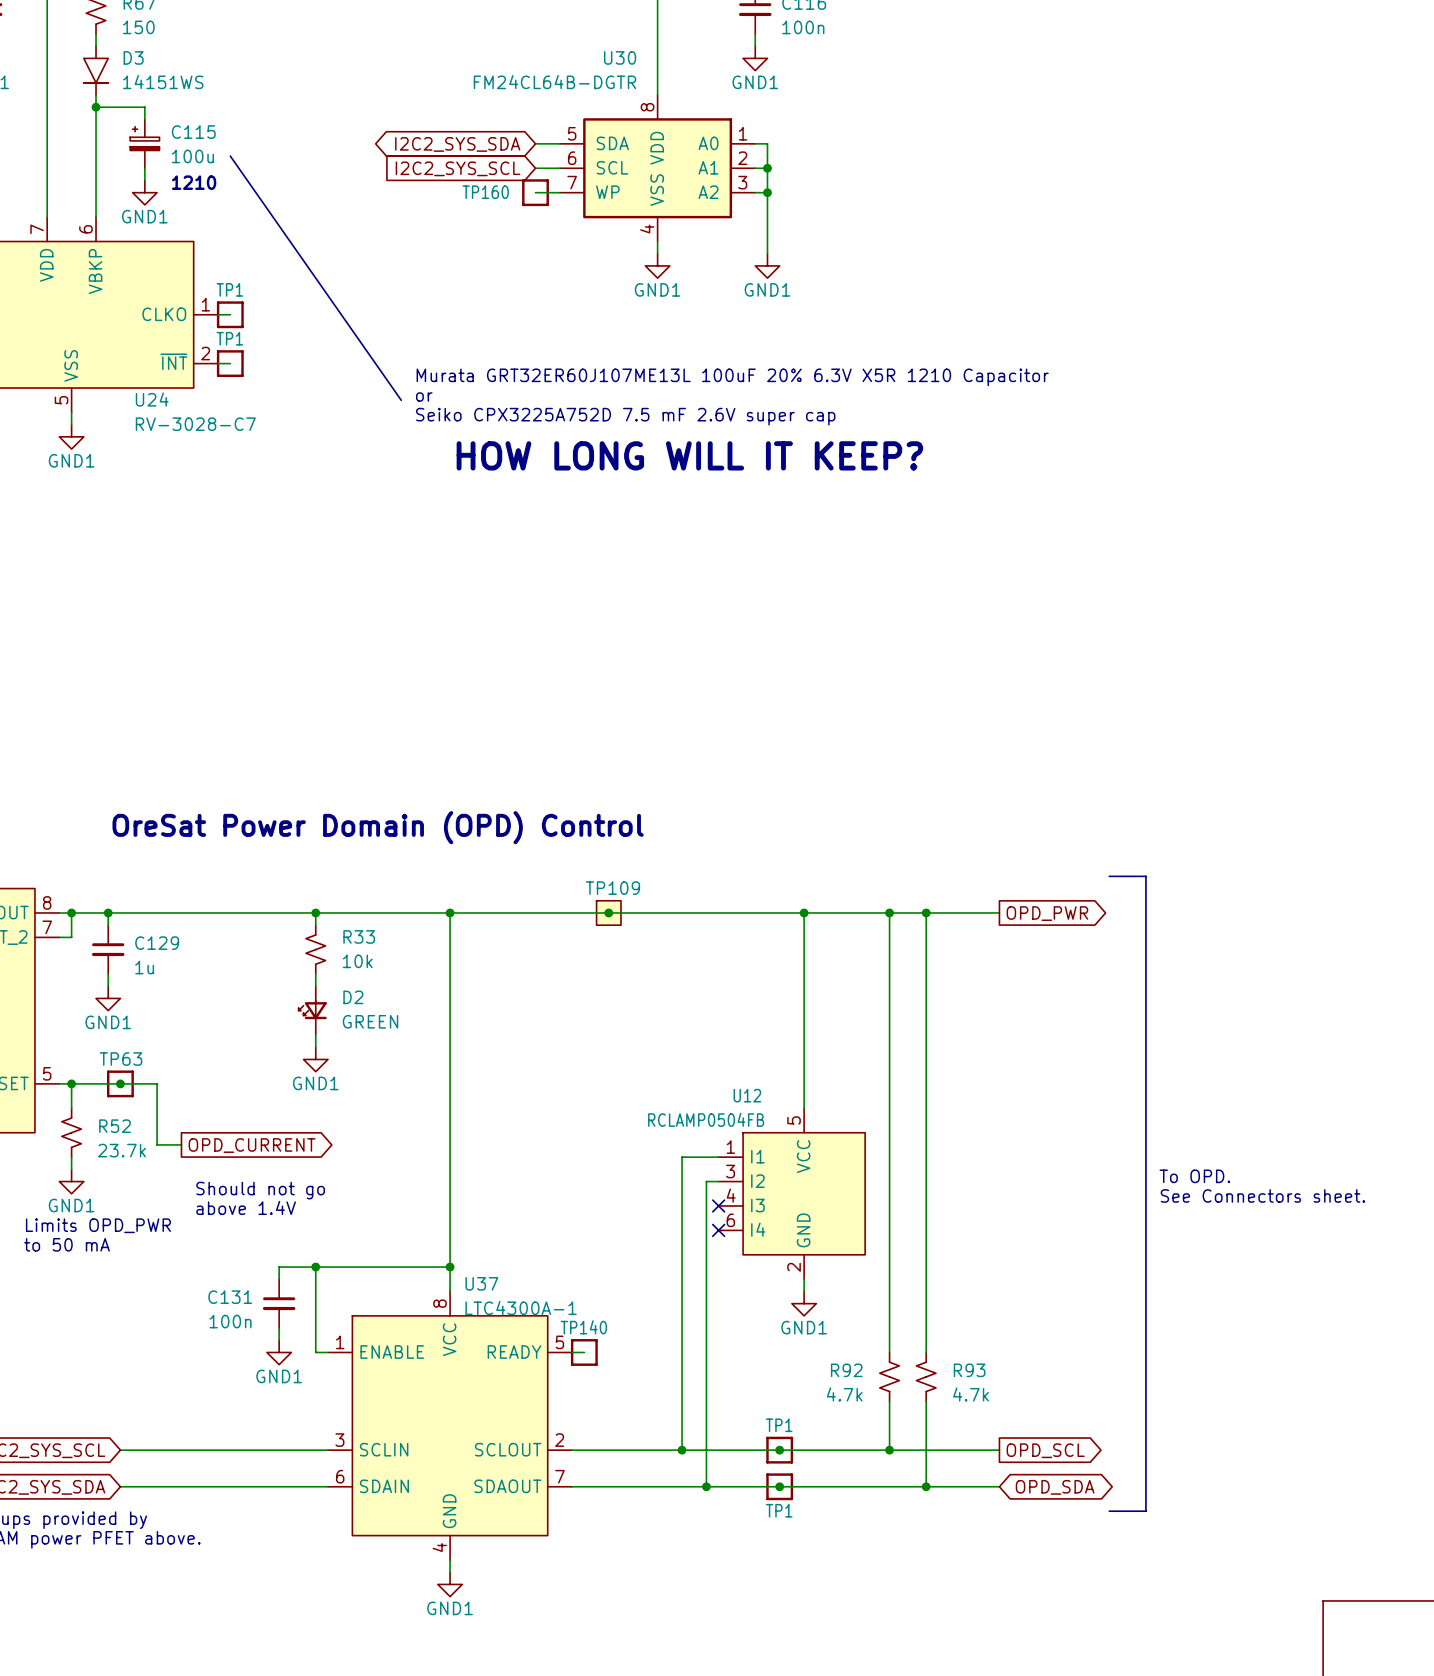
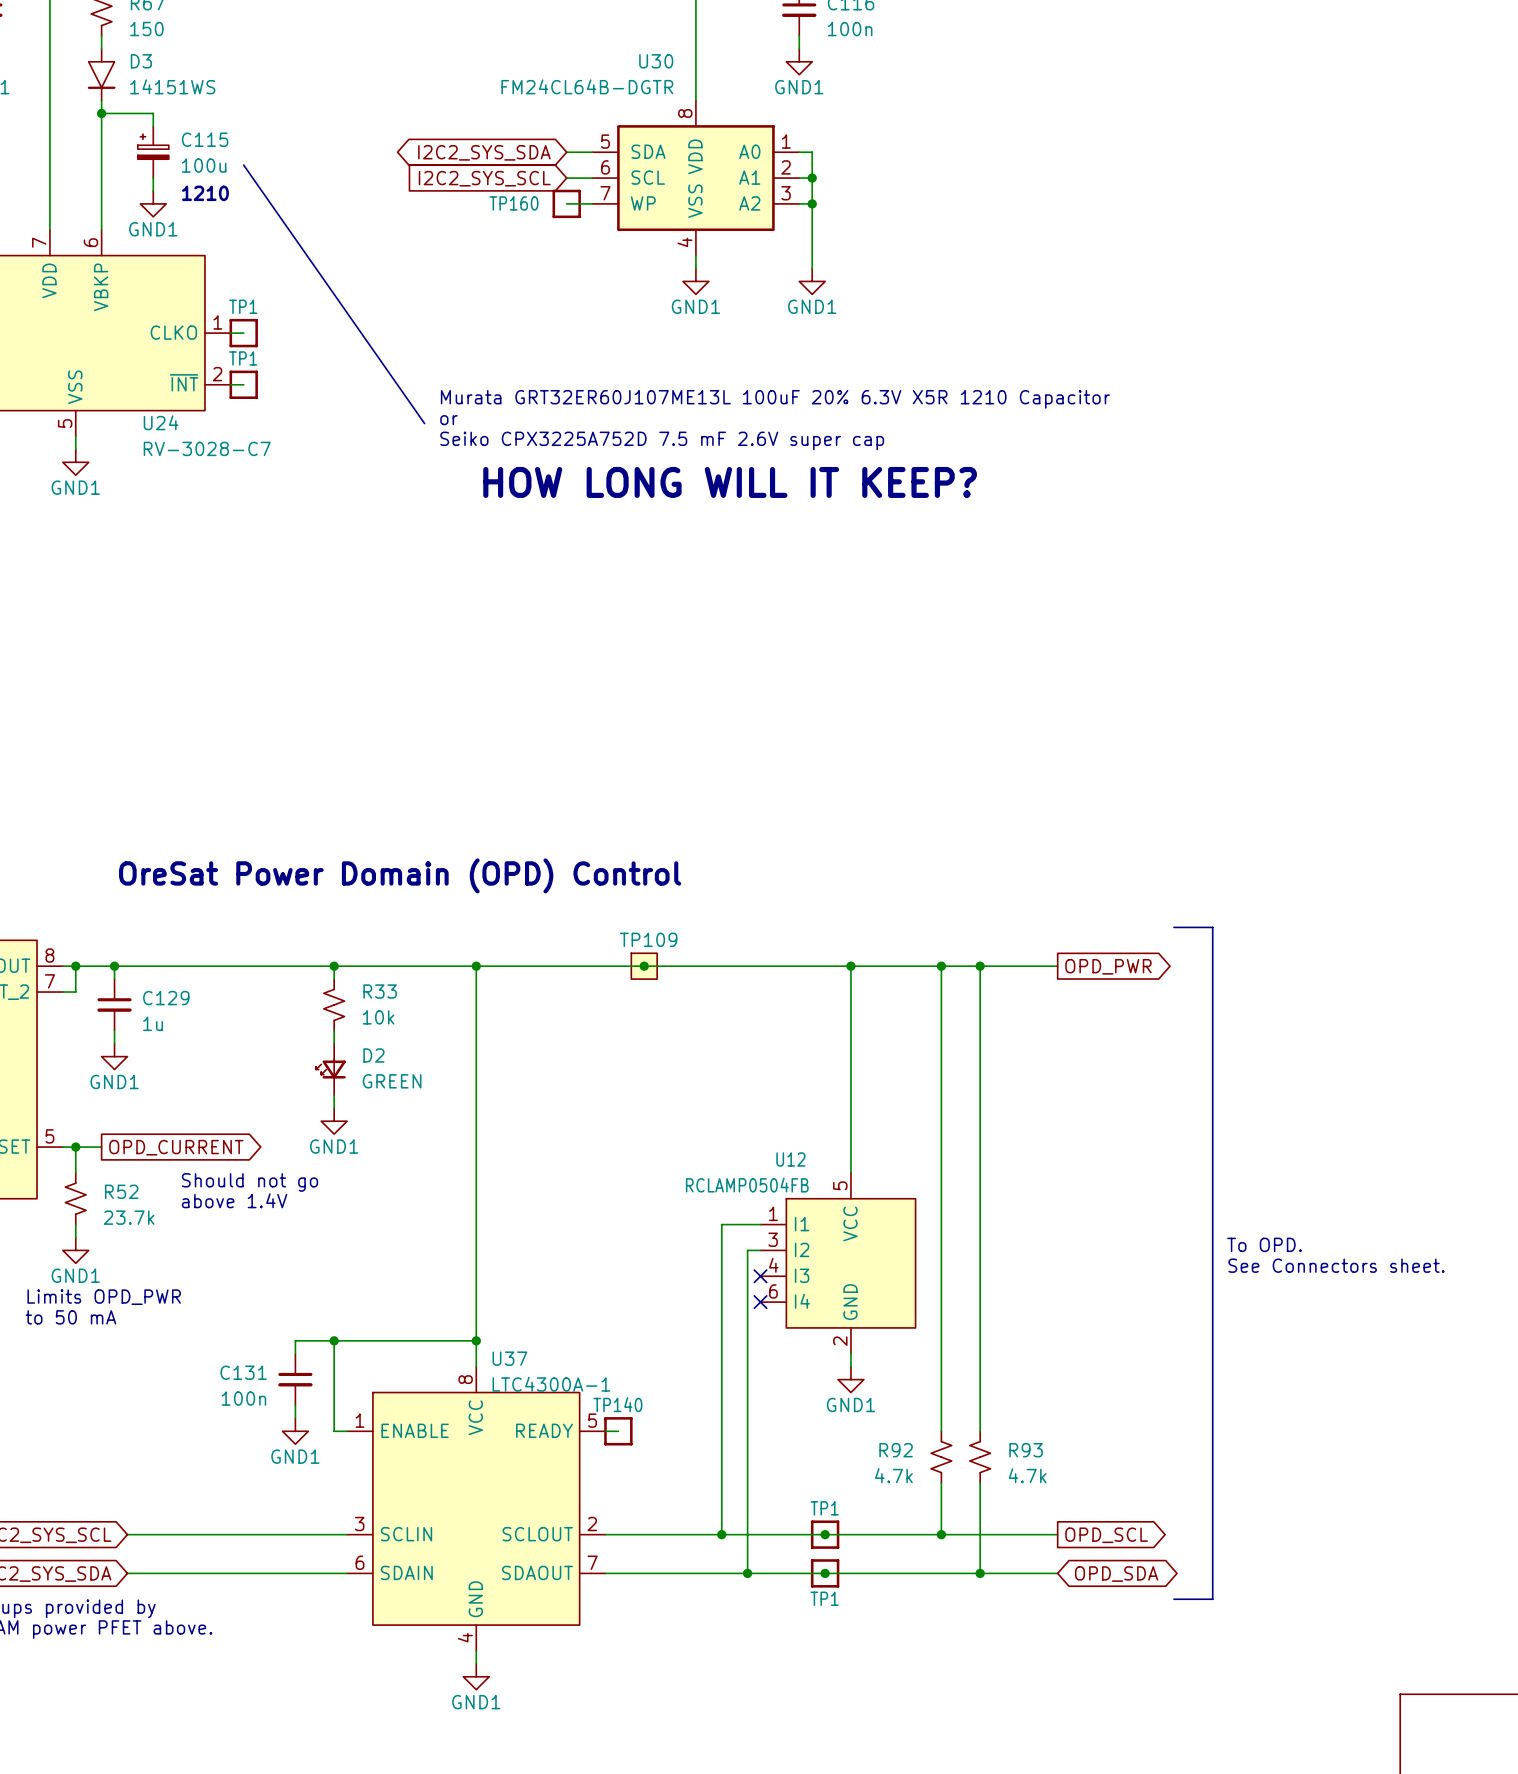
wire: (96, 1083) (157, 1083) (157, 1144) (181, 1144) -> none
junction: (120, 1083) -> none
TP63: (120, 1083) -> none
global label position: OPD_CURRENT (252, 1145) -> OPD_CURRENT (176, 1147)
text position: Should not go (260, 1190) -> Should not go (249, 1182)
text position: above 1.4V (246, 1207) -> above 1.4V (234, 1200)

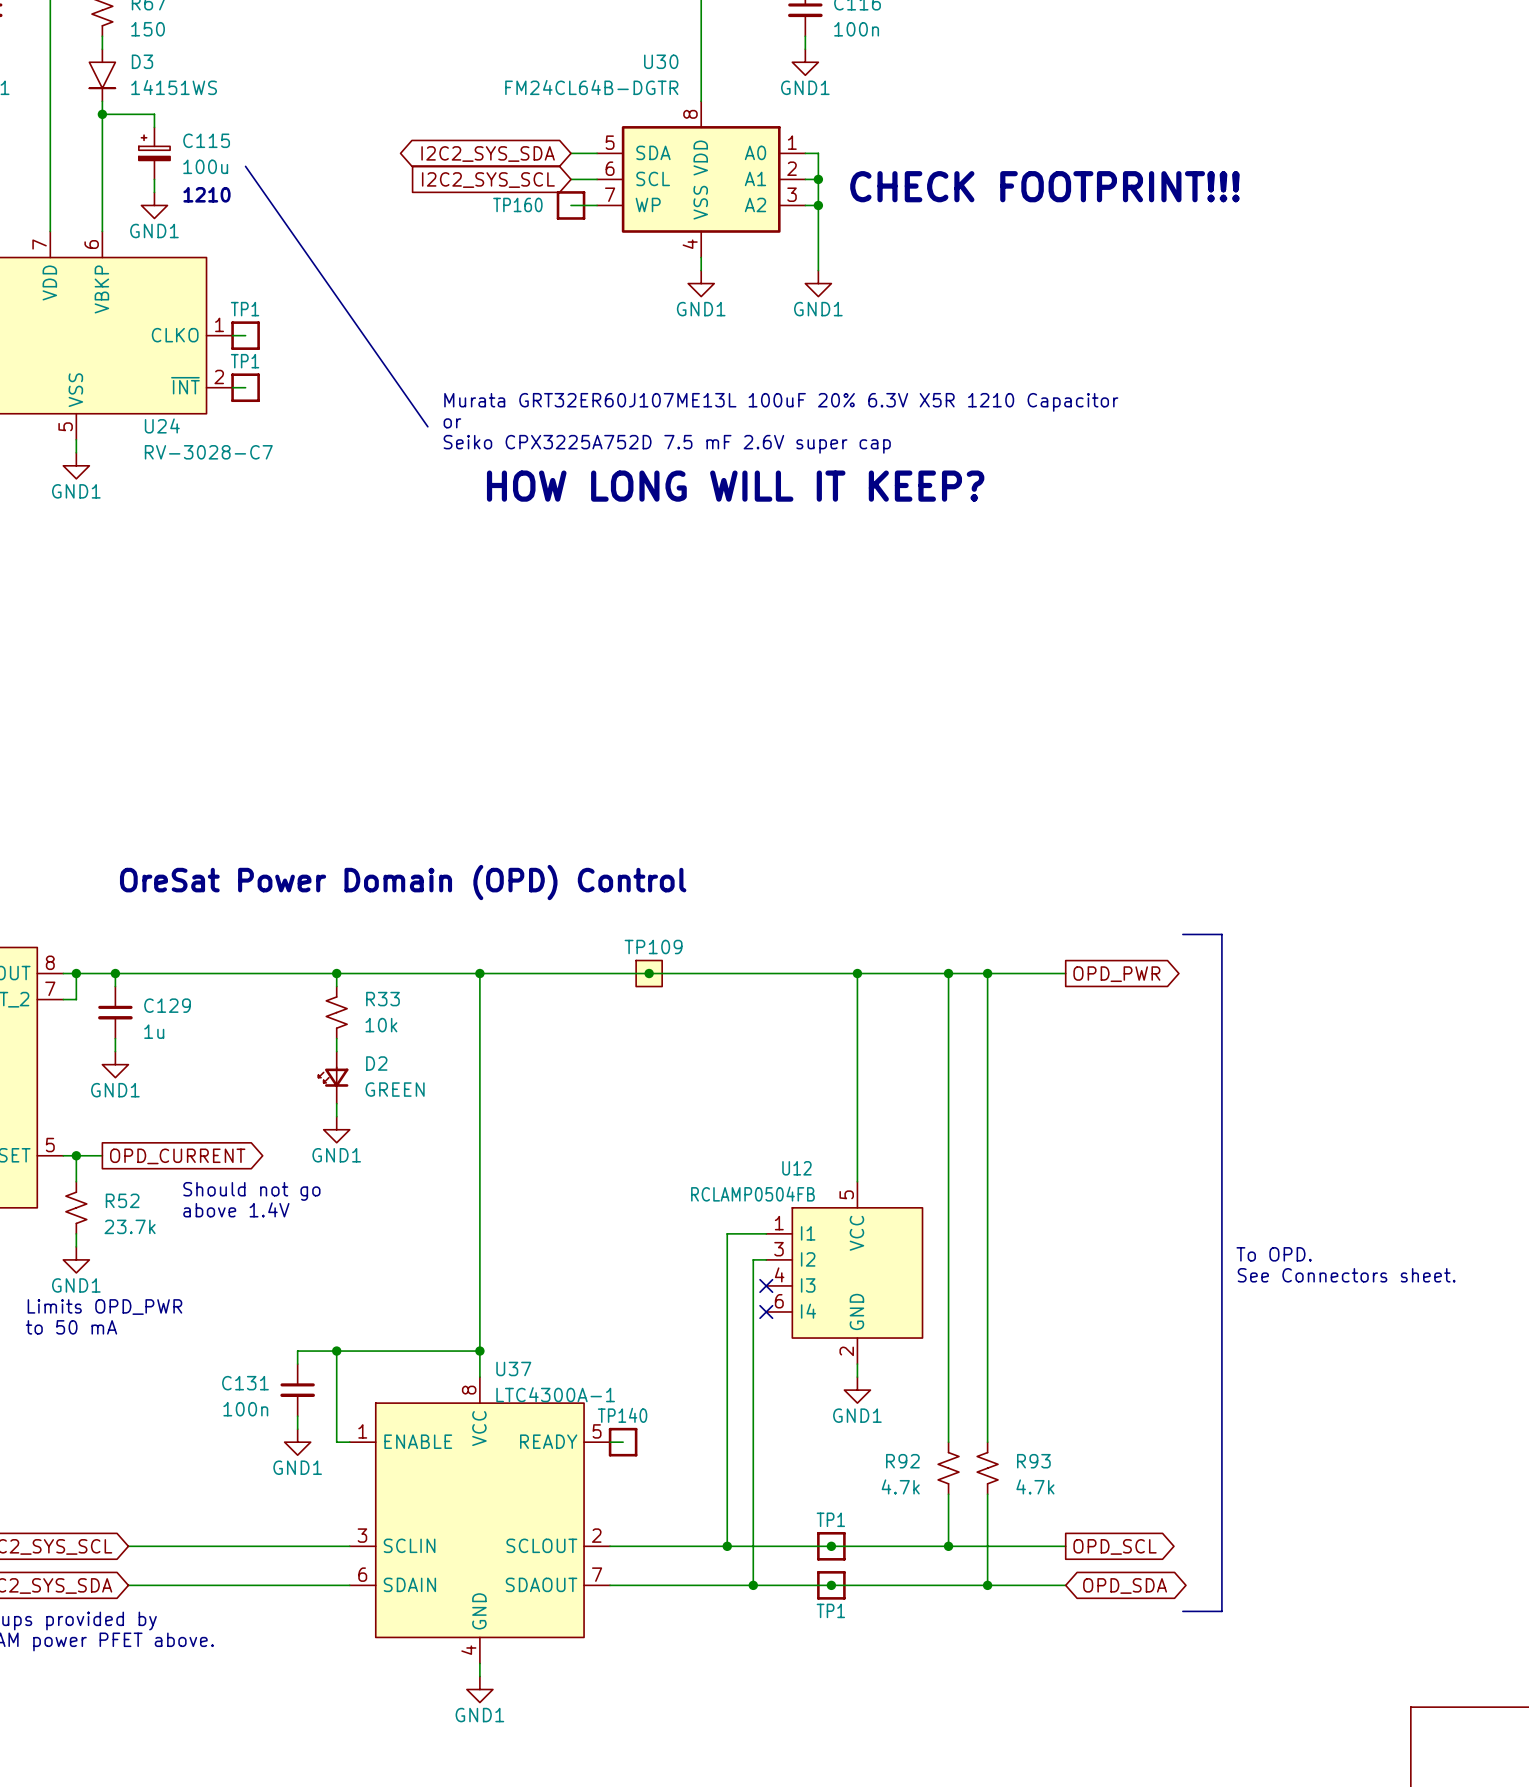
text: none -> CHECK FOOTPRINT!!! (1044, 186)

